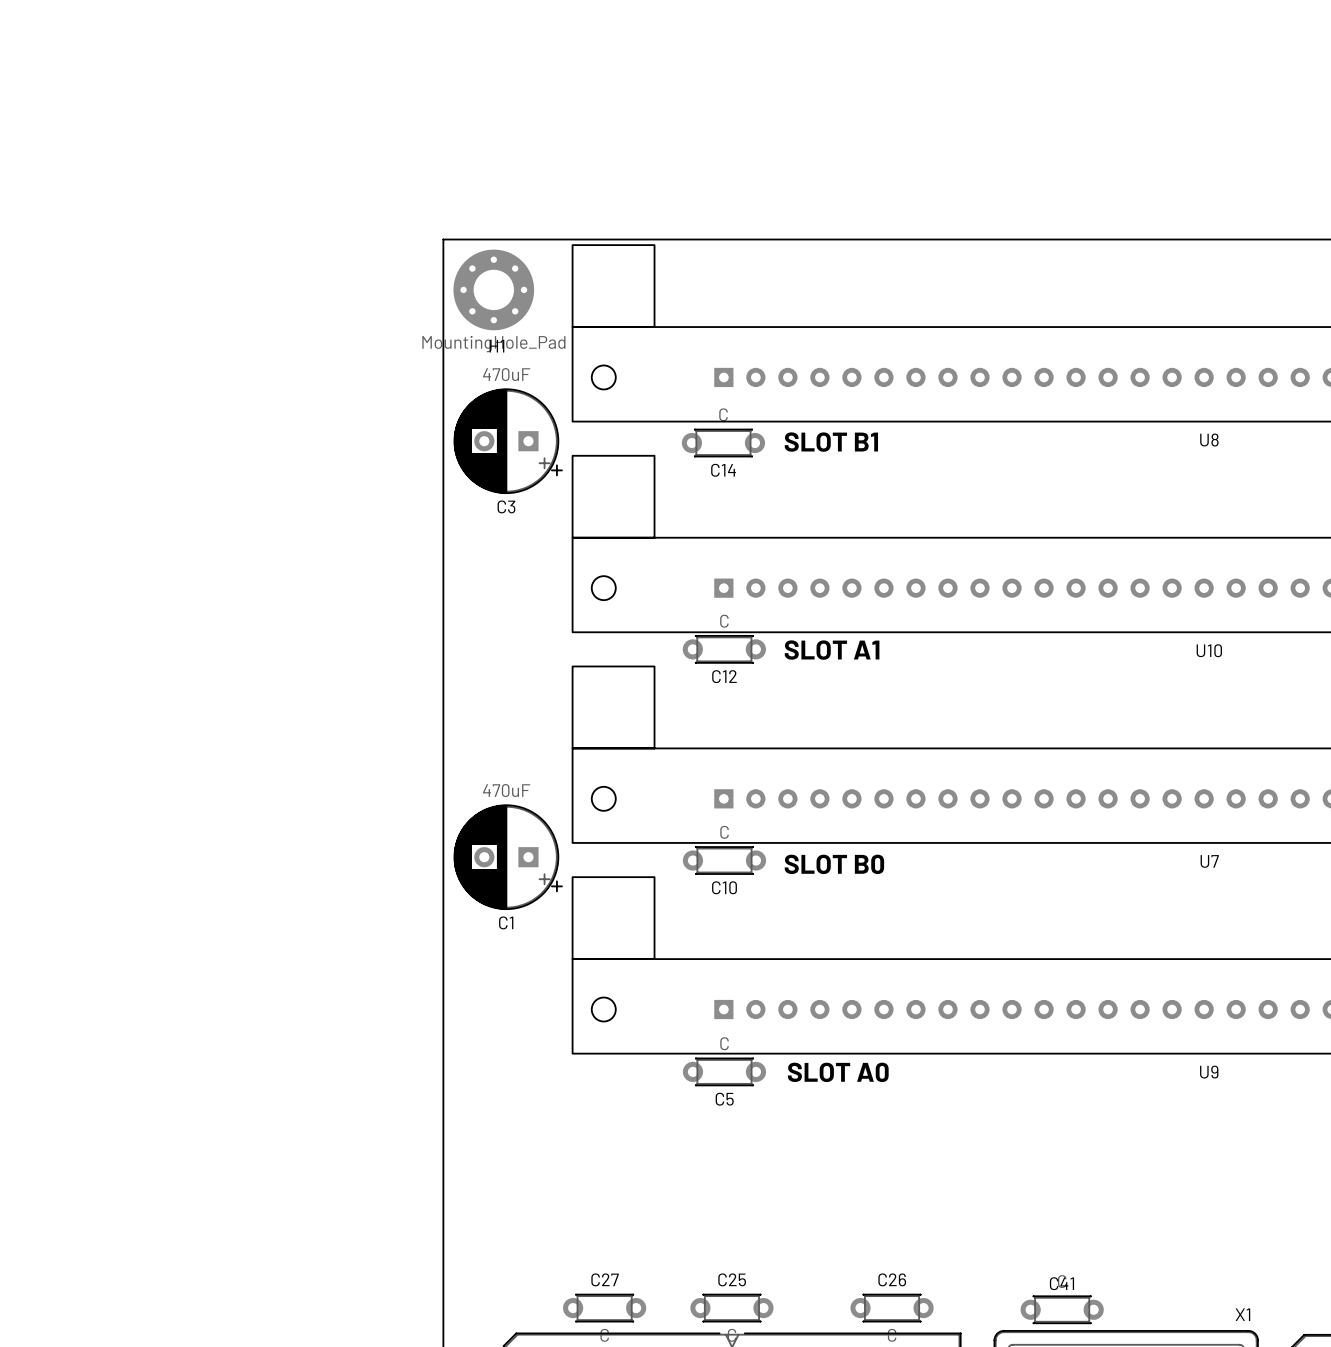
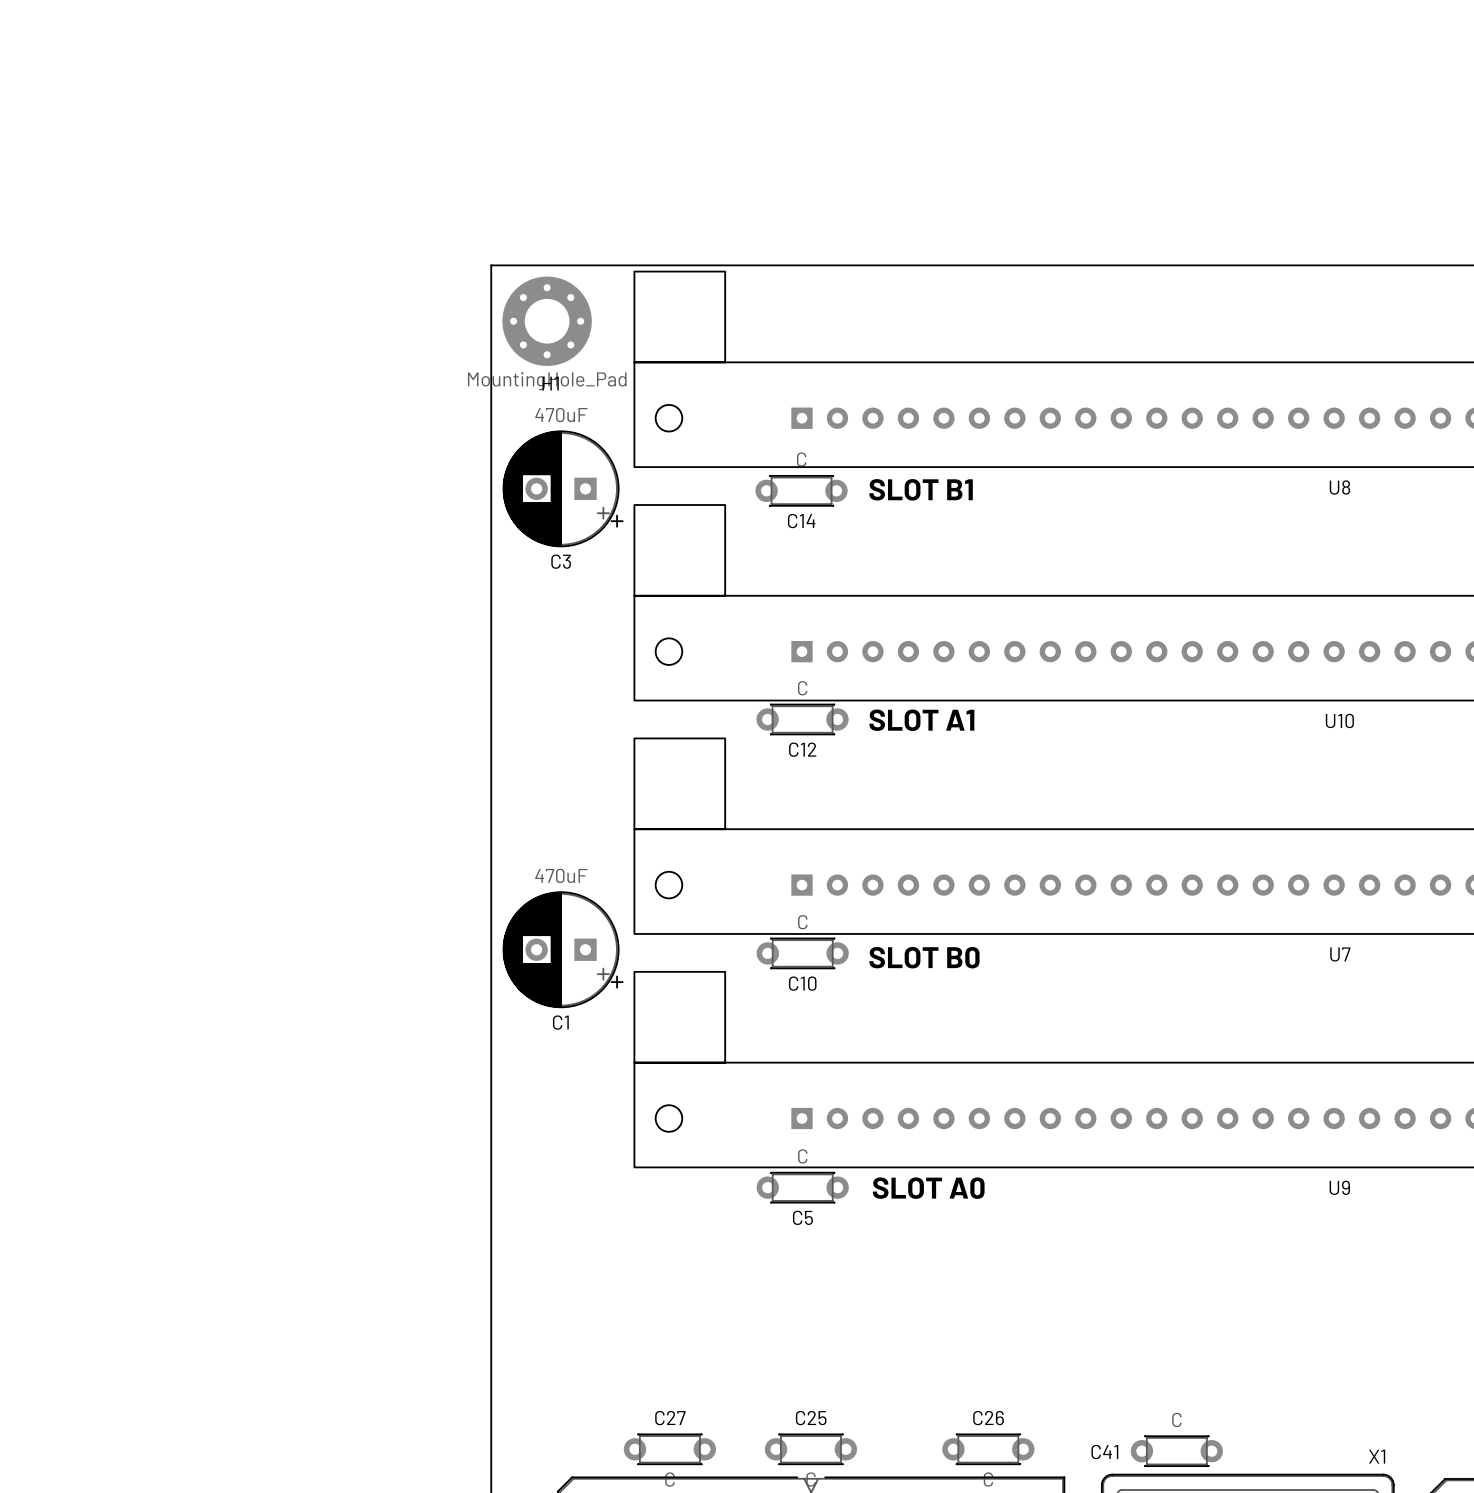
C41 name position: C41 (1061, 1283) -> C41 (1104, 1452)

